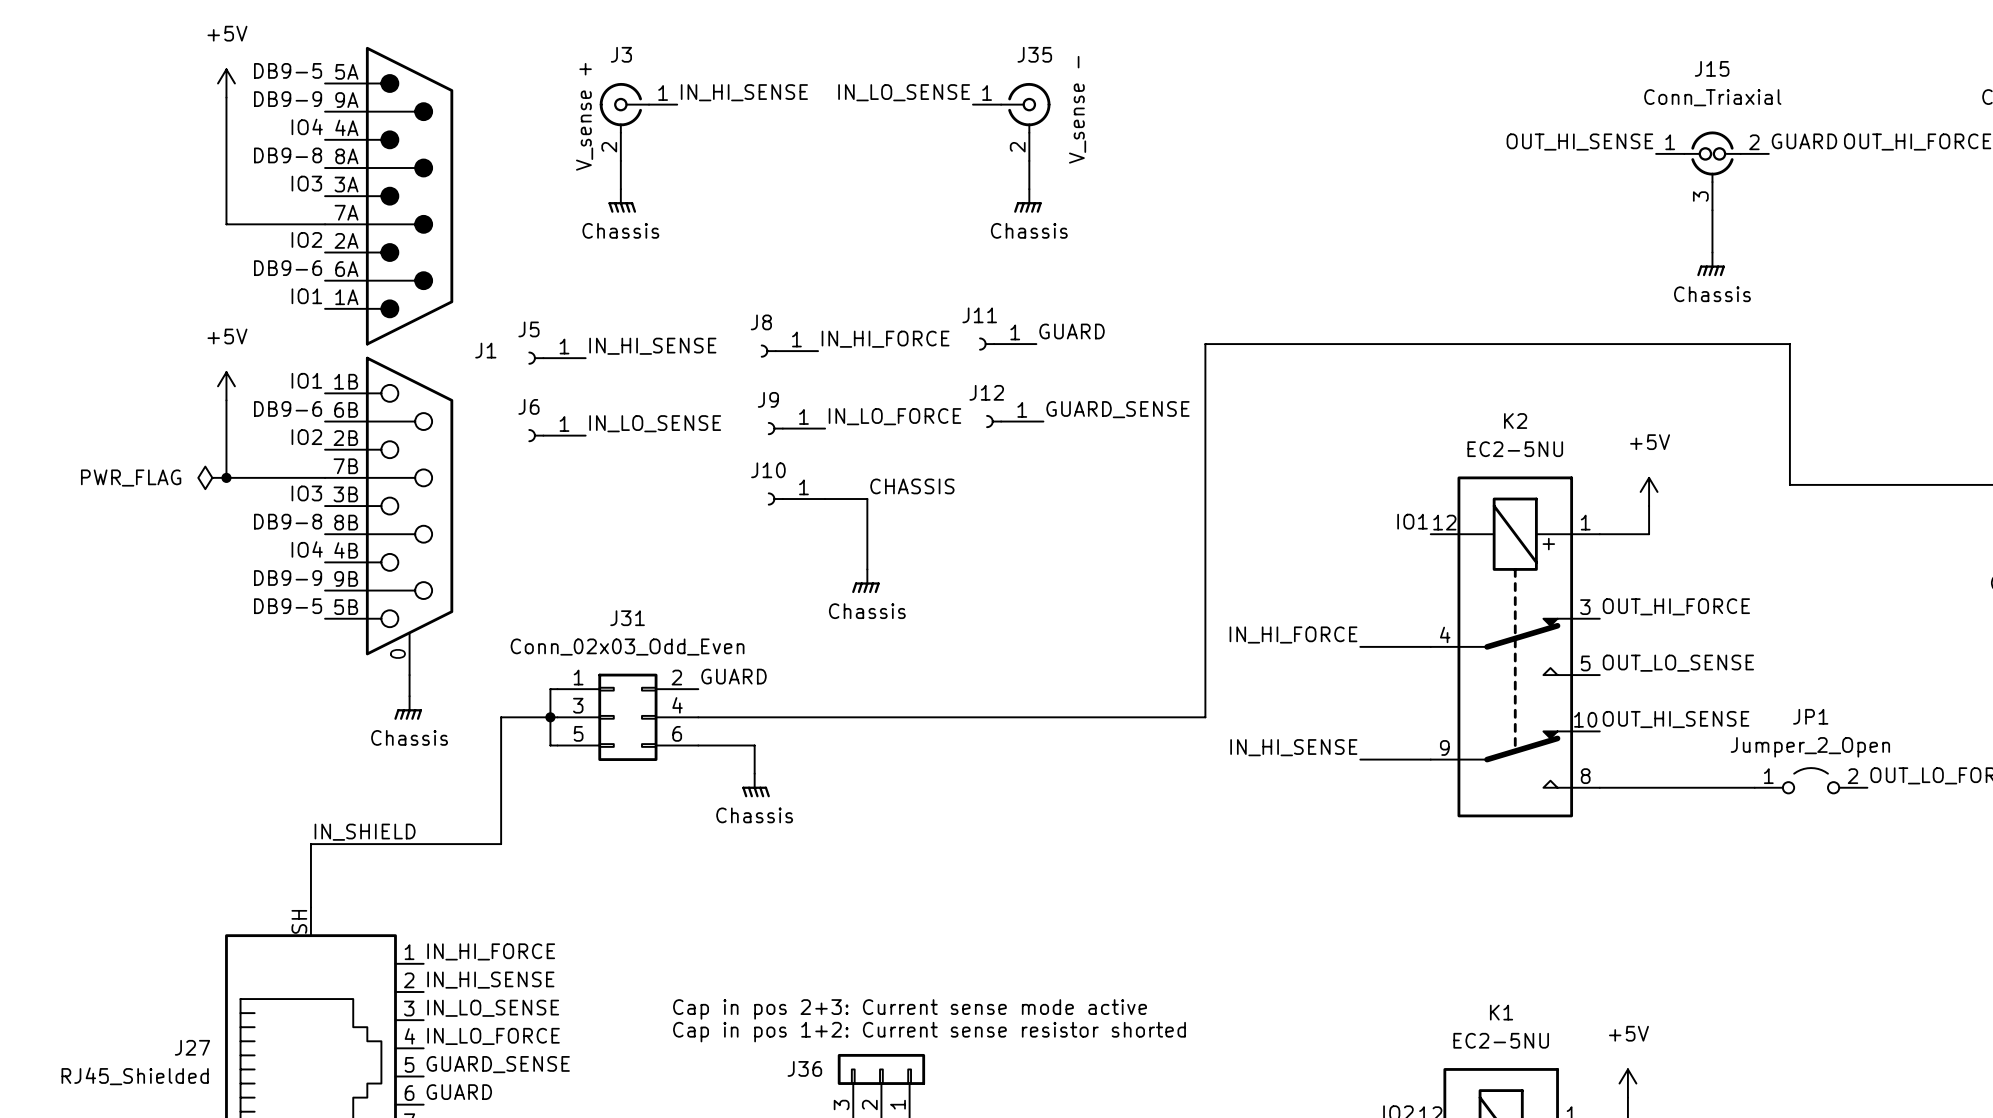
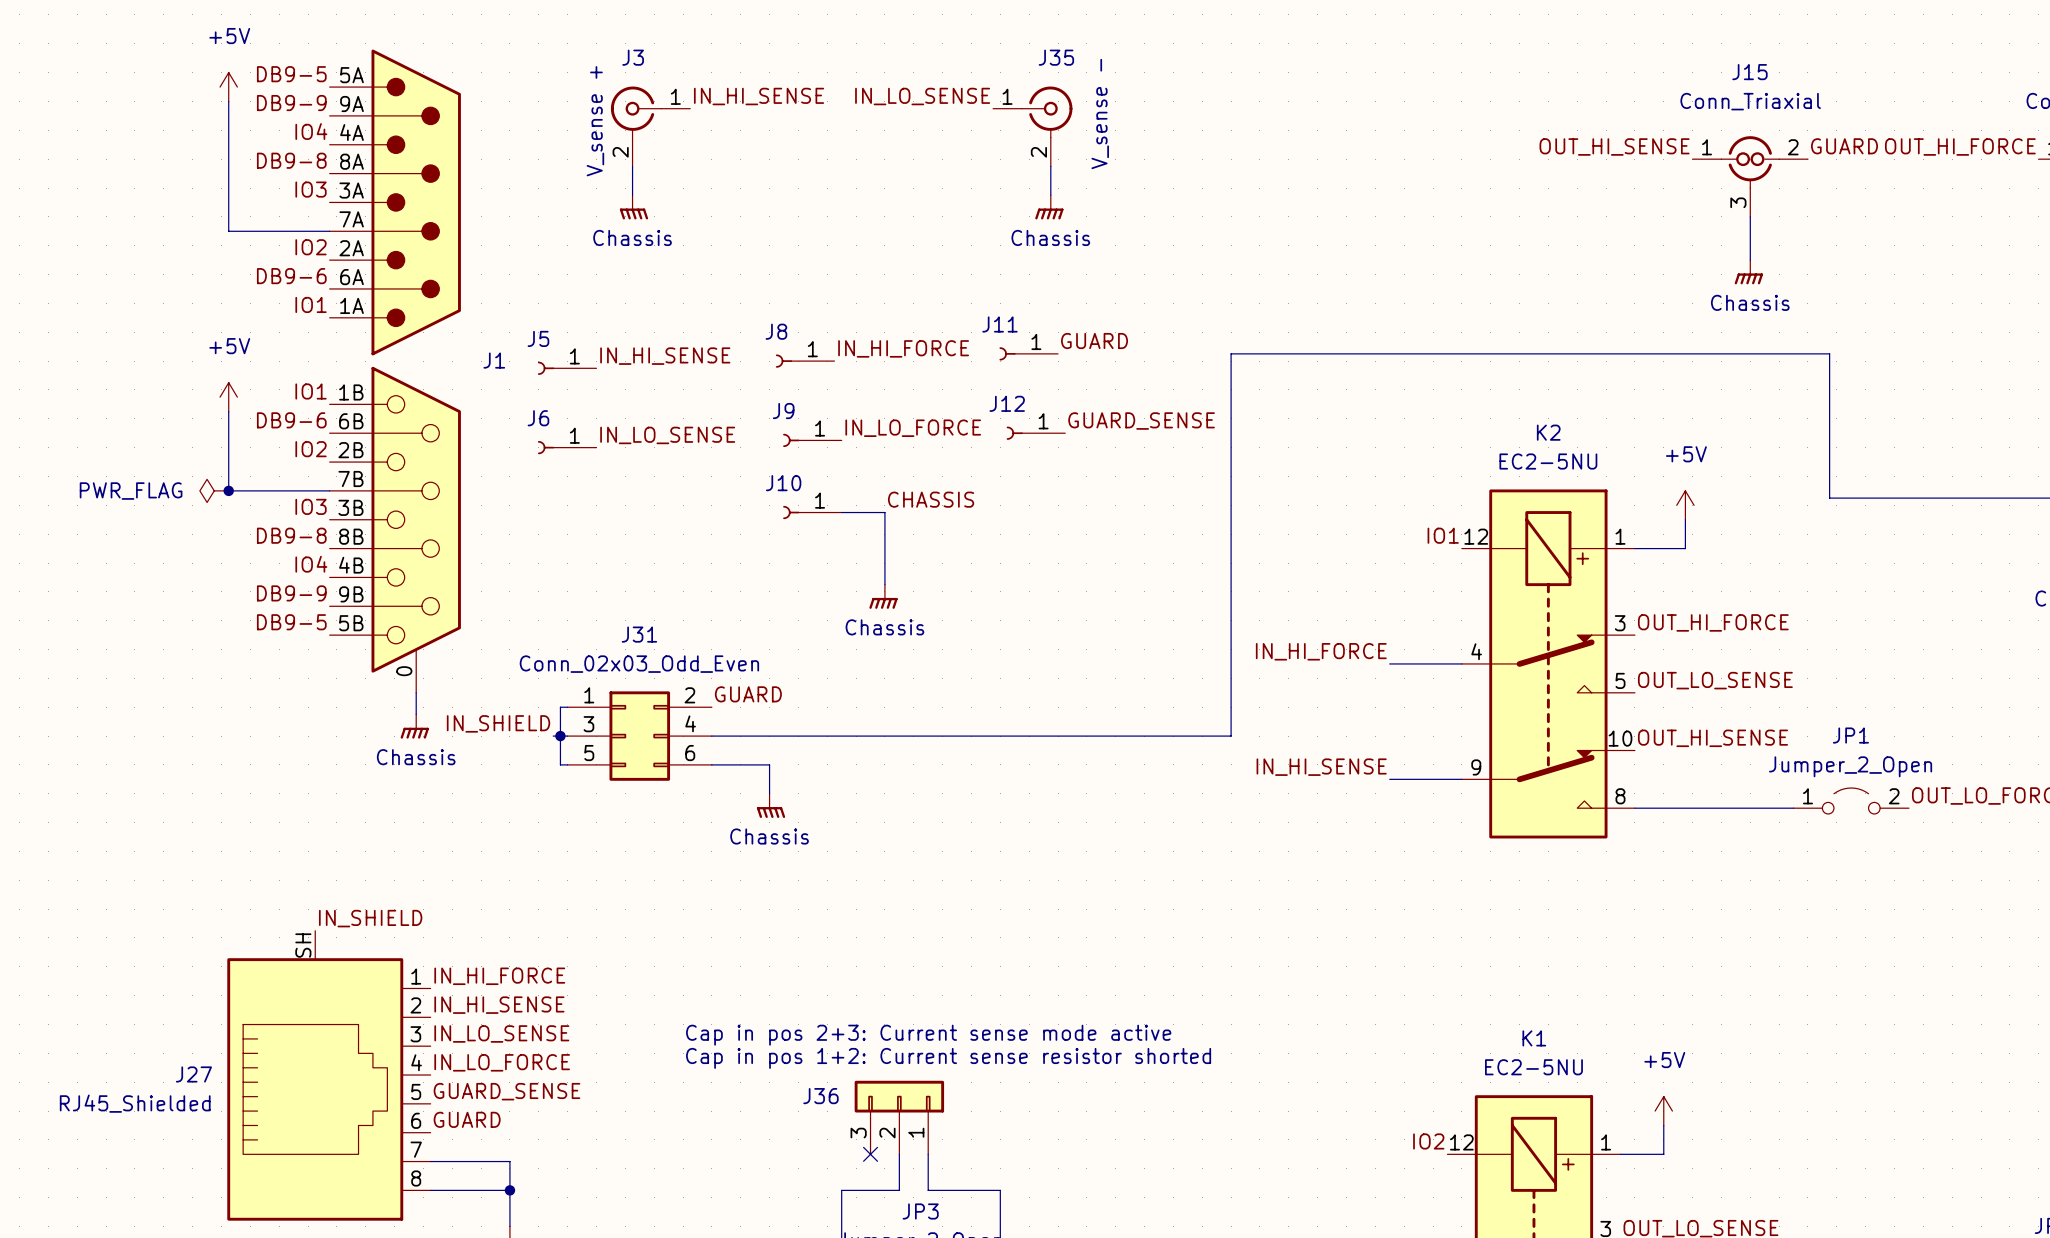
label: none -> IN_SHIELD (498, 723)
wire: (543, 717) (501, 717) (501, 844) (310, 844) (310, 907) -> none
label position: IN_SHIELD (365, 832) -> IN_SHIELD (370, 918)

